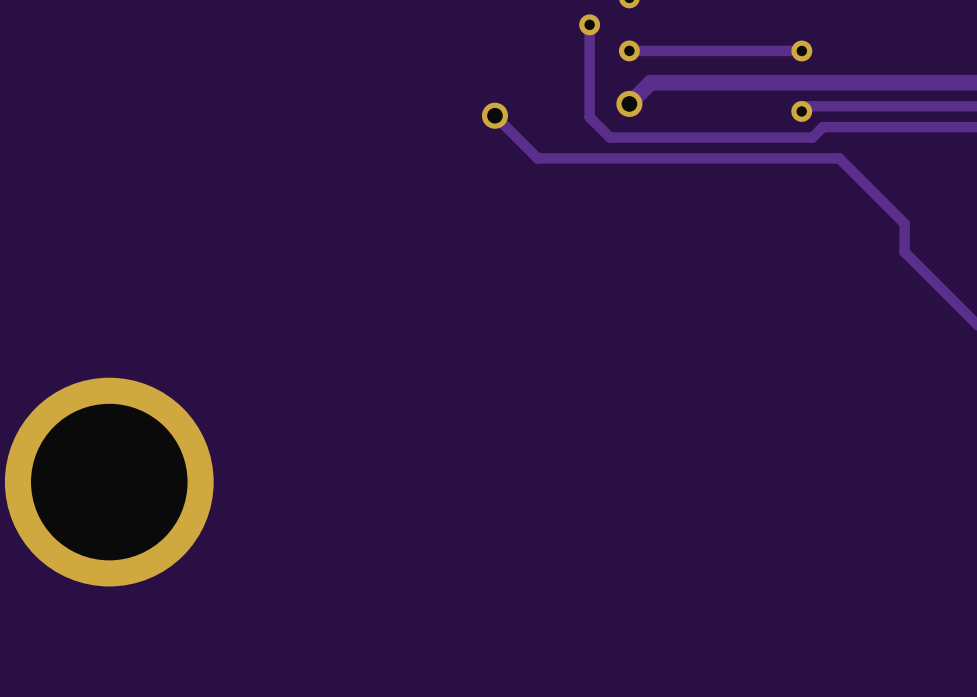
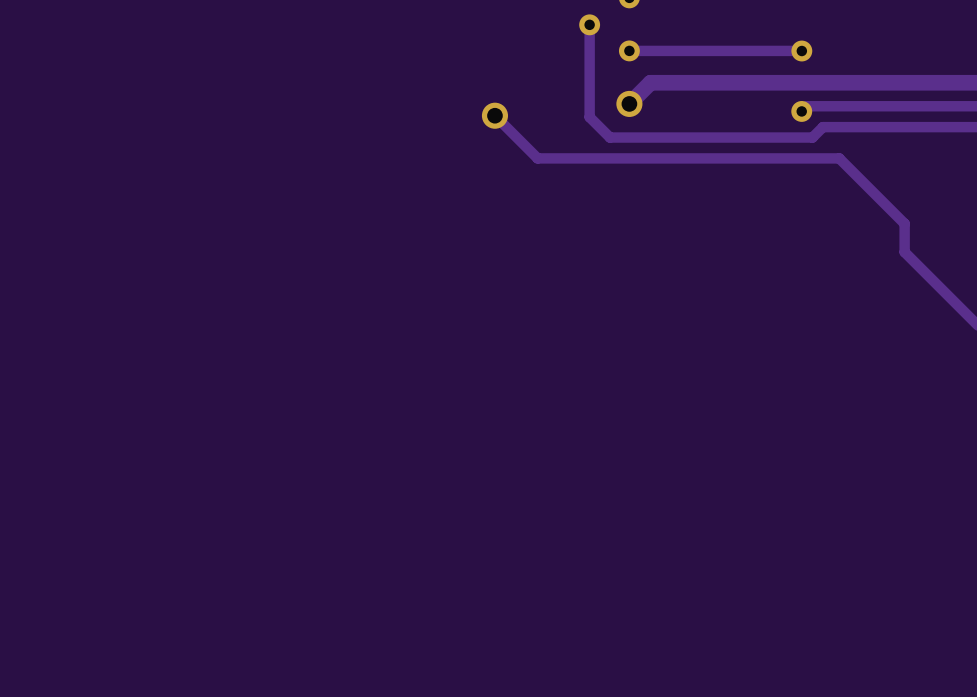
via: (109, 482) -> none

